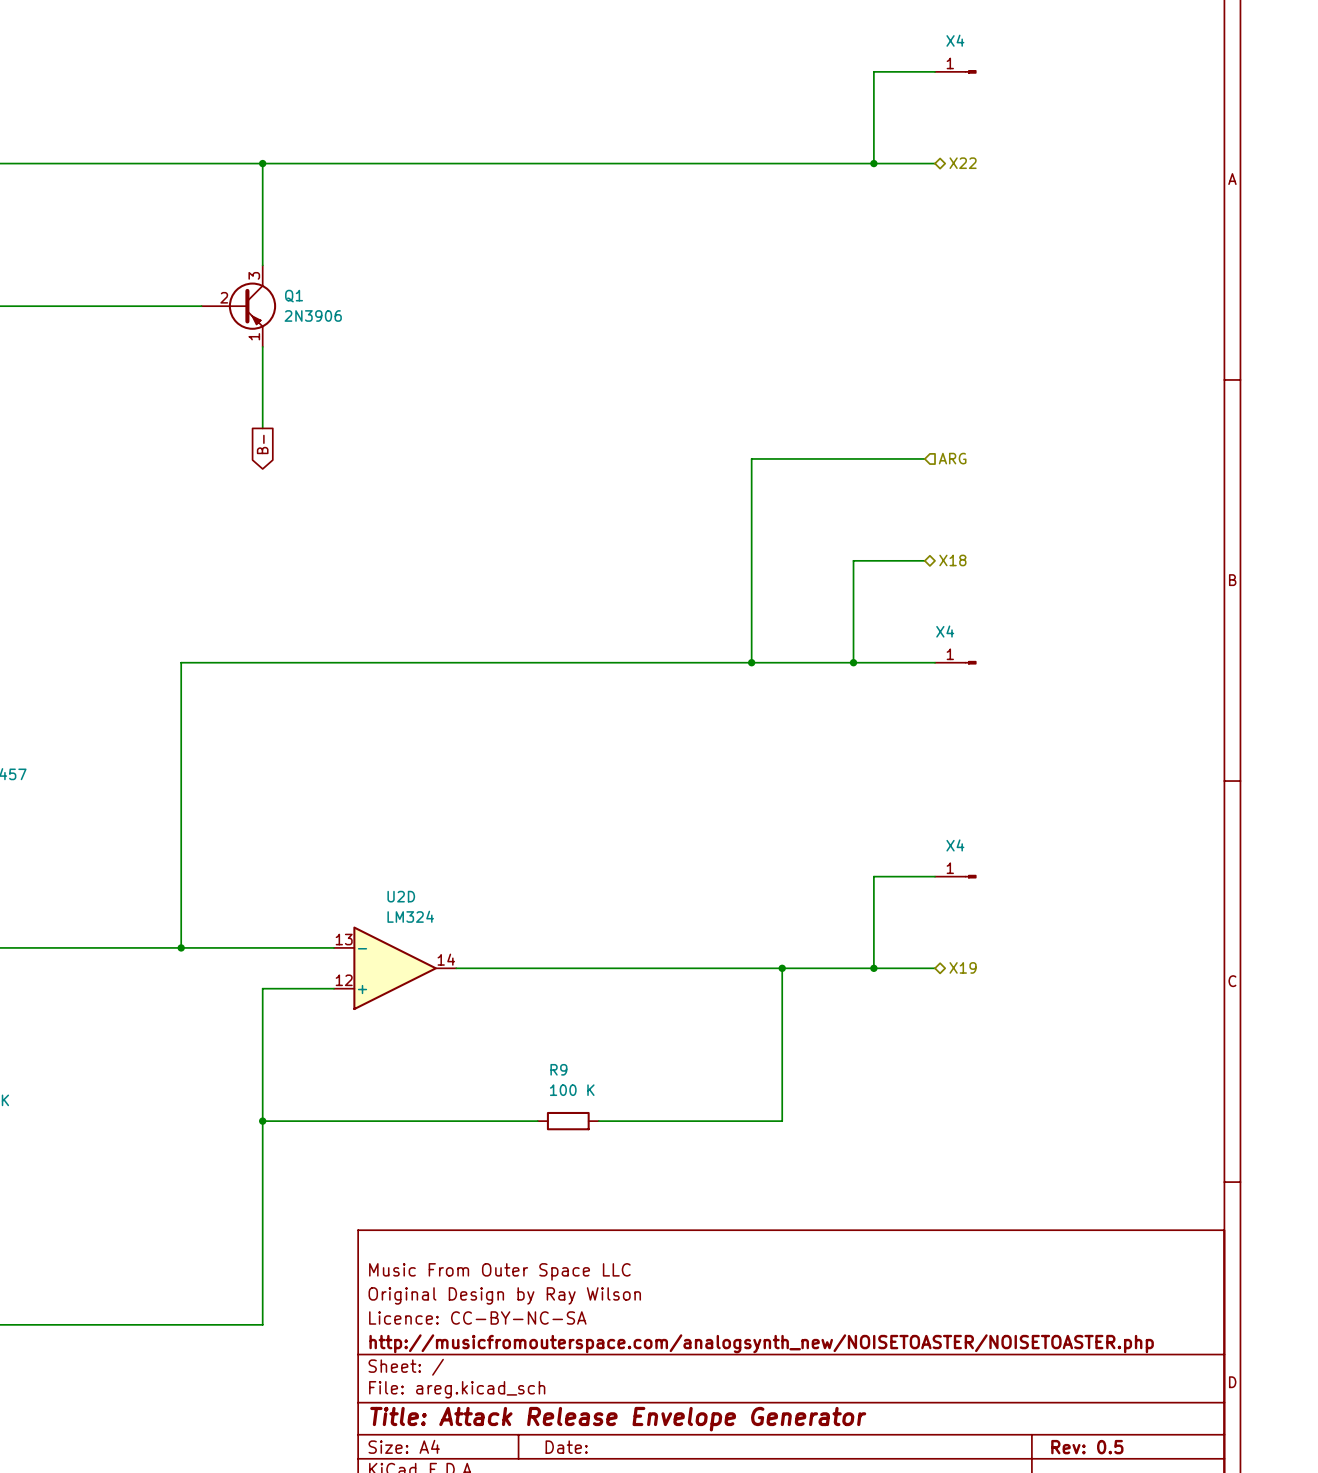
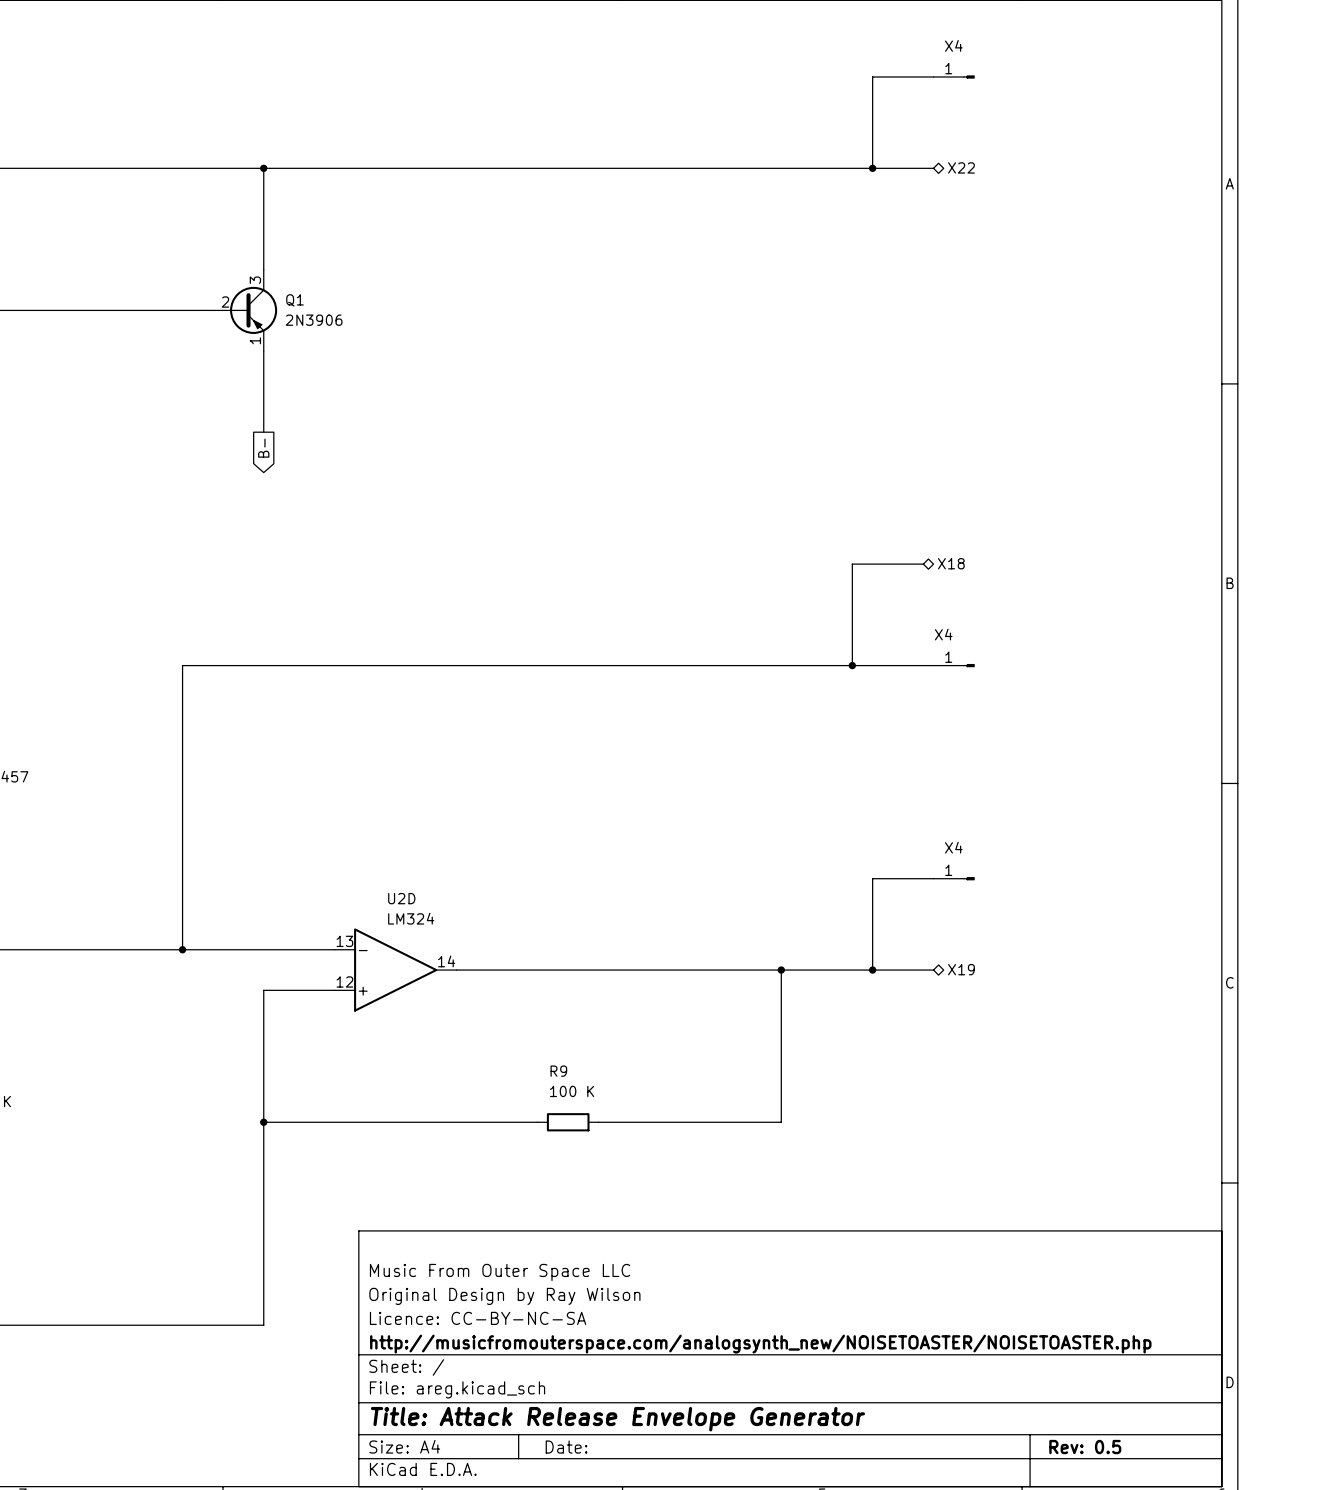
wire: (924, 458) (751, 458) (751, 662) -> none
hierarchical label: ARG (952, 458) -> none
junction: (751, 662) -> none

